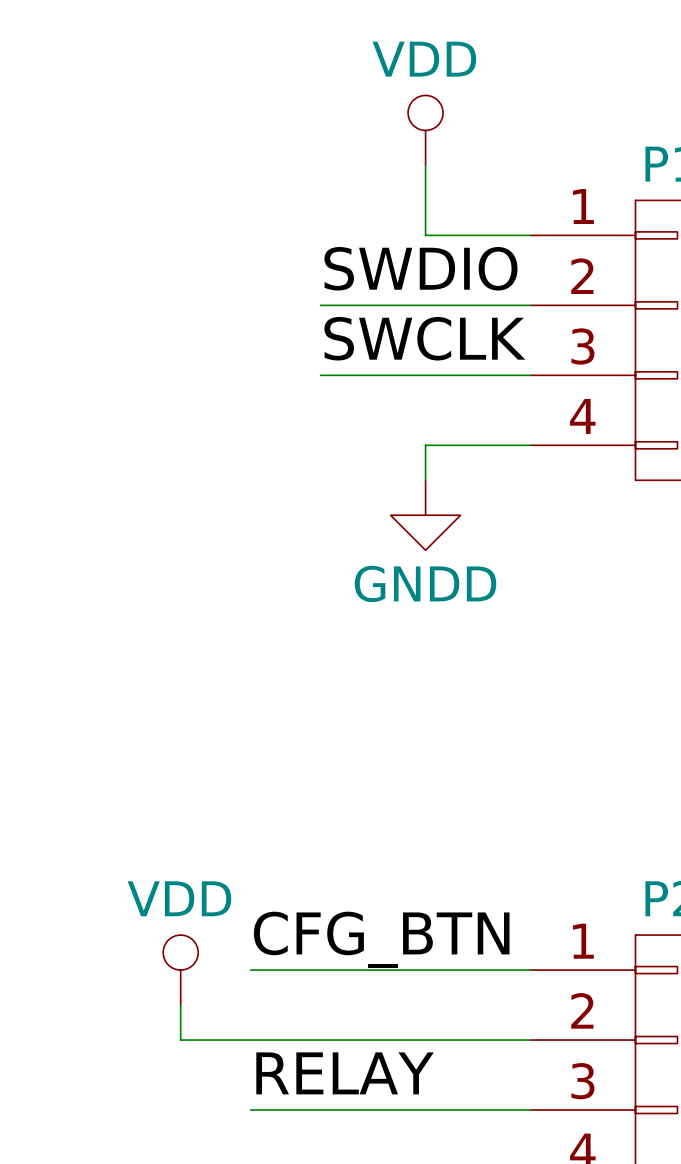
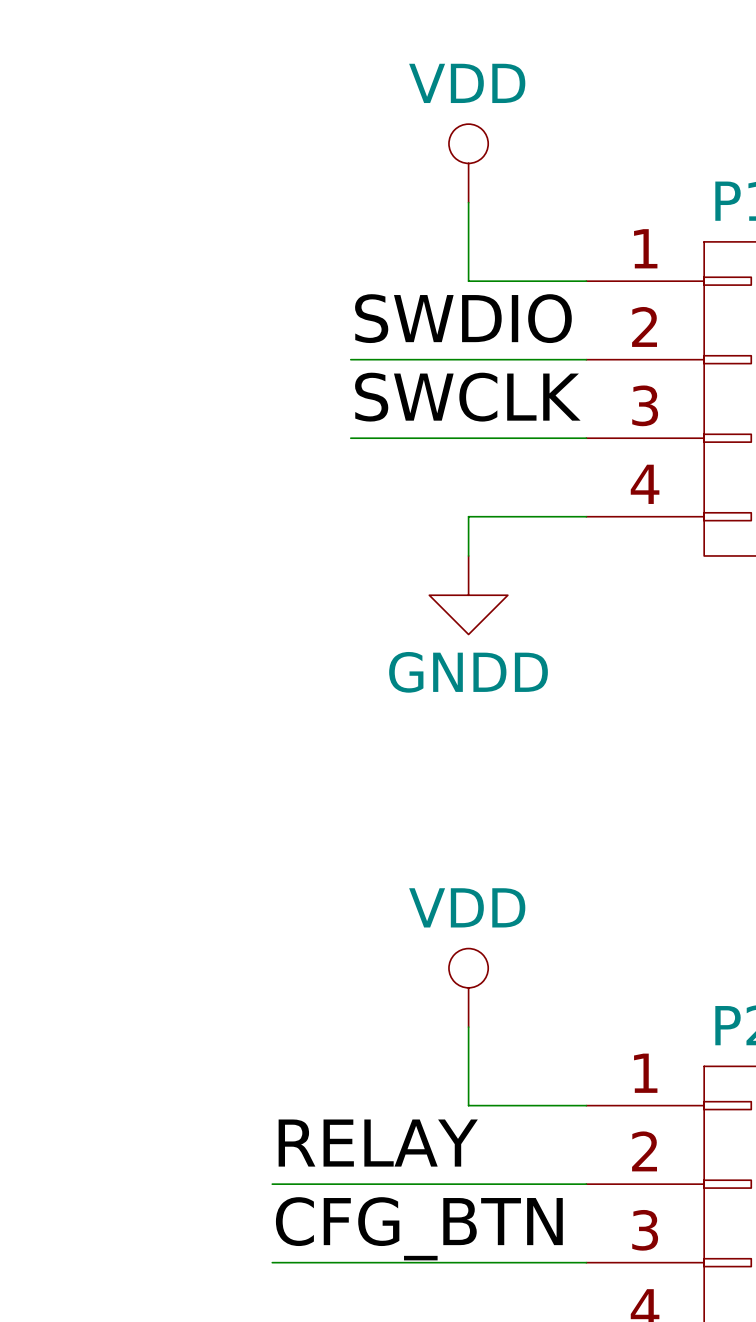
label: CFG_BTN (381, 939) -> none
power symbol position: VDD (180, 970) -> VDD (468, 987)
wire: (250, 970) (425, 970) -> (468, 1027) (468, 1105)
label: none -> RELAY (378, 1143)
wire: (180, 1005) (180, 1040) (250, 1040) -> none
label: RELAY (345, 1073) -> CFG_BTN (419, 1228)

